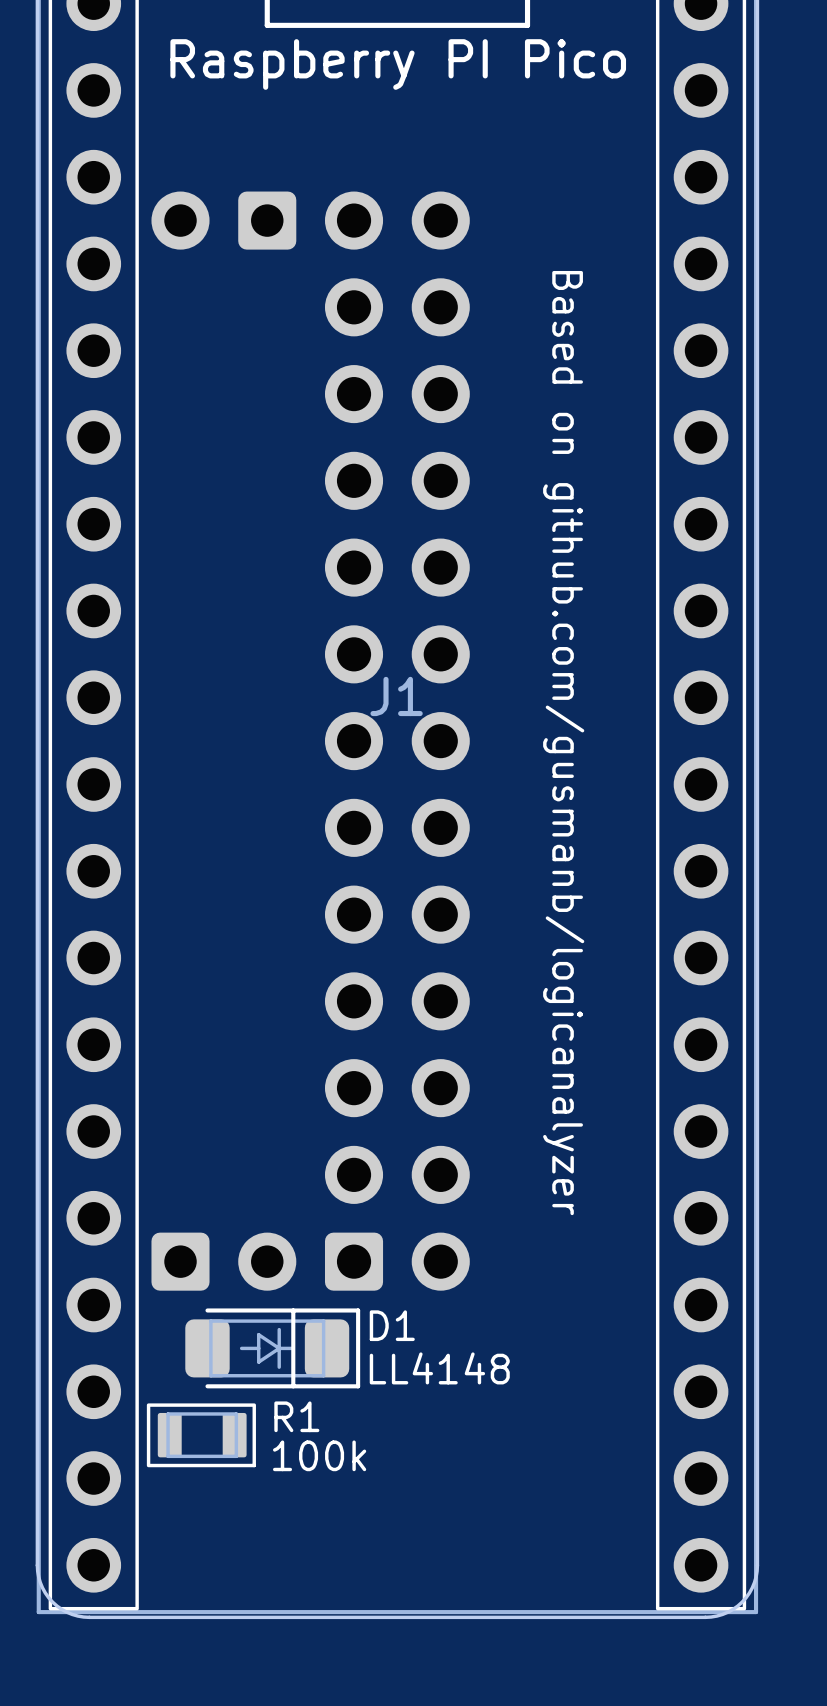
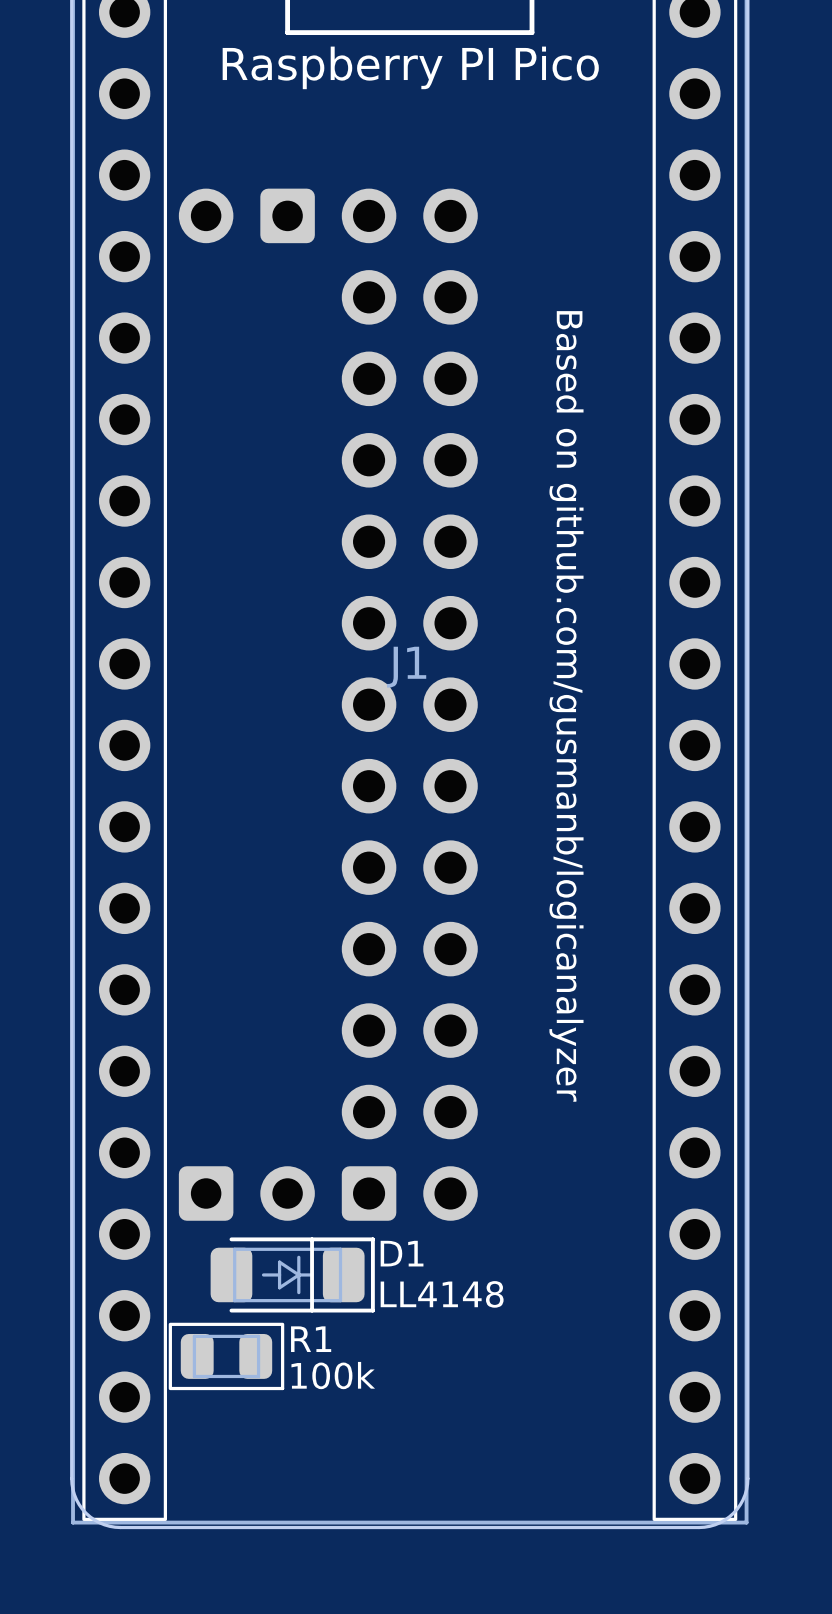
R1 footprint: [146, 1403, 256, 1468] -> [168, 1322, 285, 1391]

